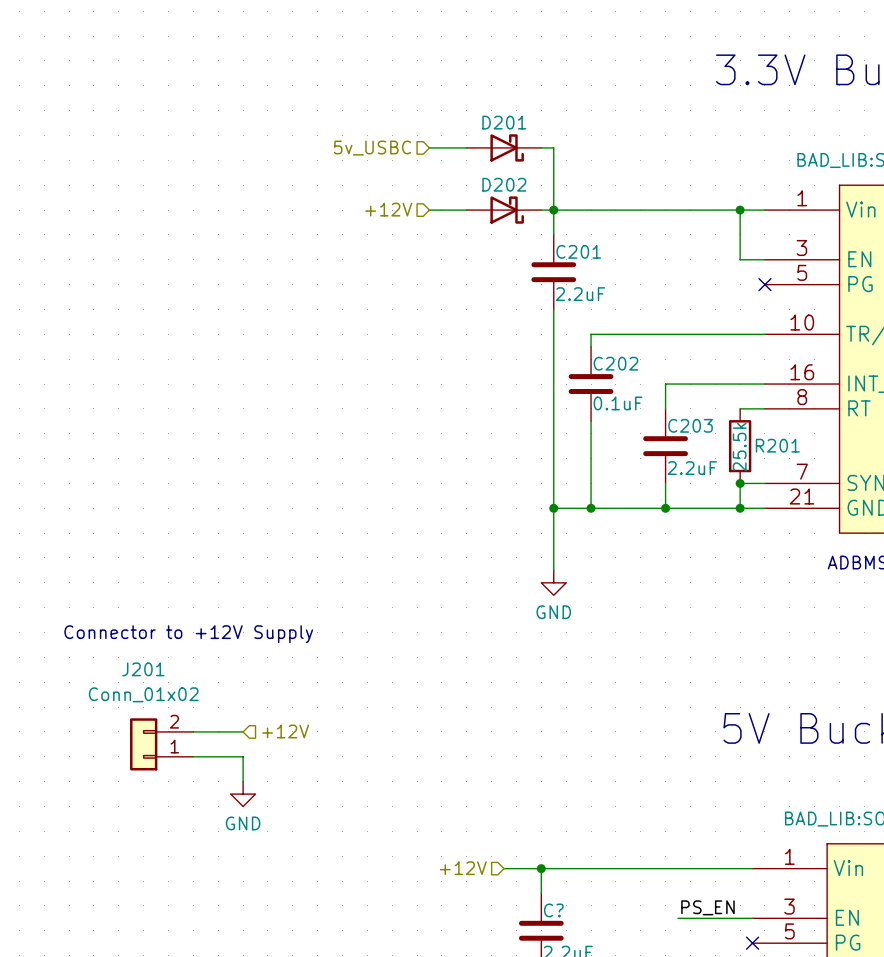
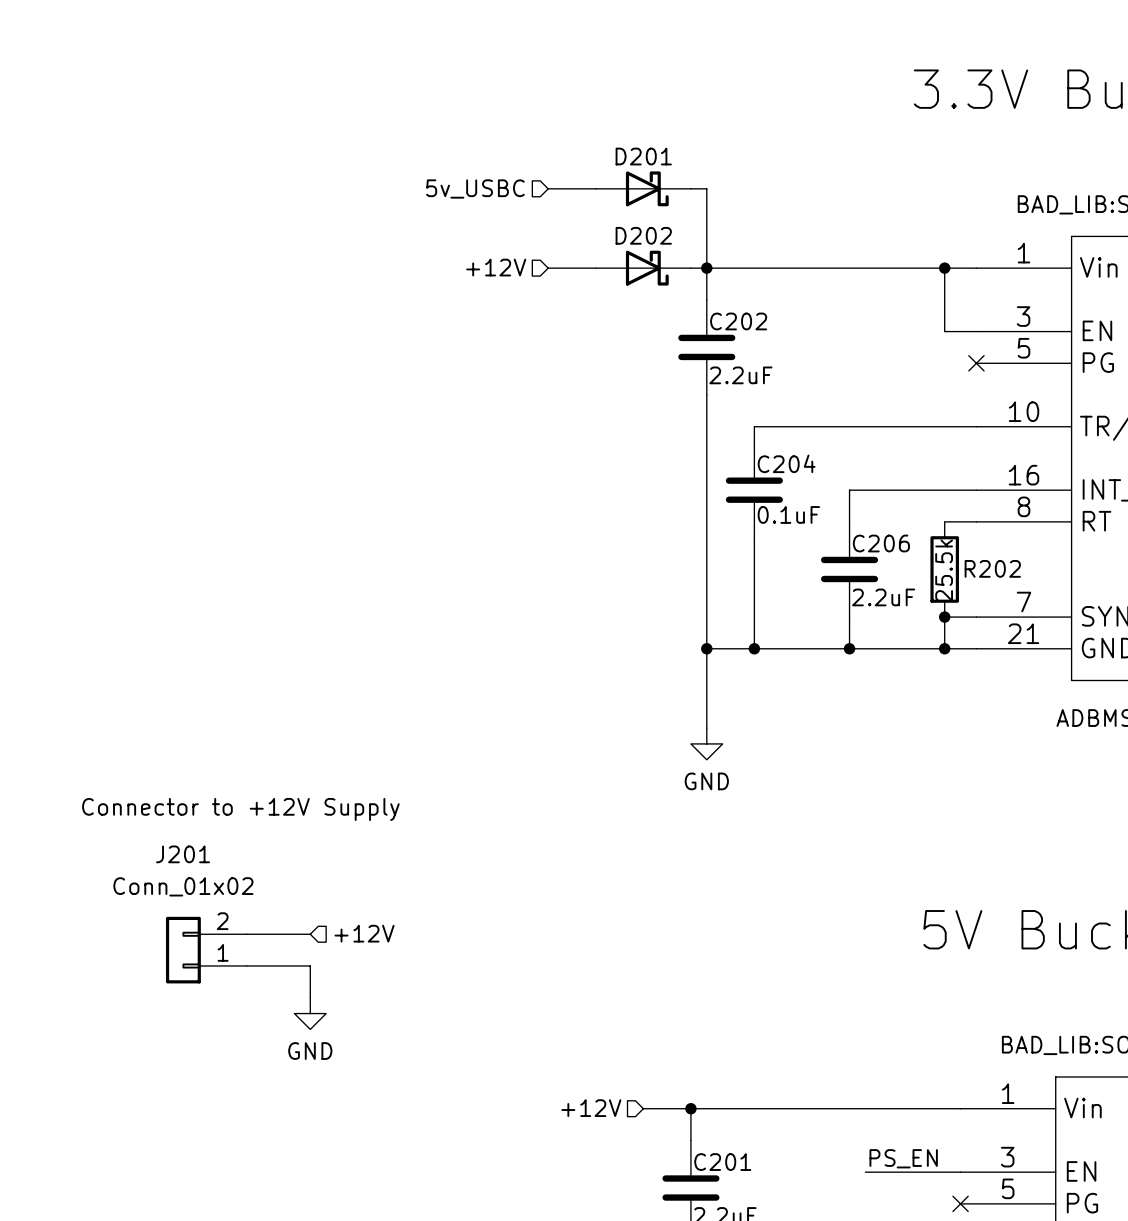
C201 name: C201 (578, 251) -> C202 (738, 321)
C202 name: C202 (615, 363) -> C204 (786, 463)
C203 name: C203 (690, 425) -> C206 (881, 543)
R201 name: R201 (777, 445) -> R202 (992, 568)
C? name: C? (553, 910) -> C201 (722, 1162)

